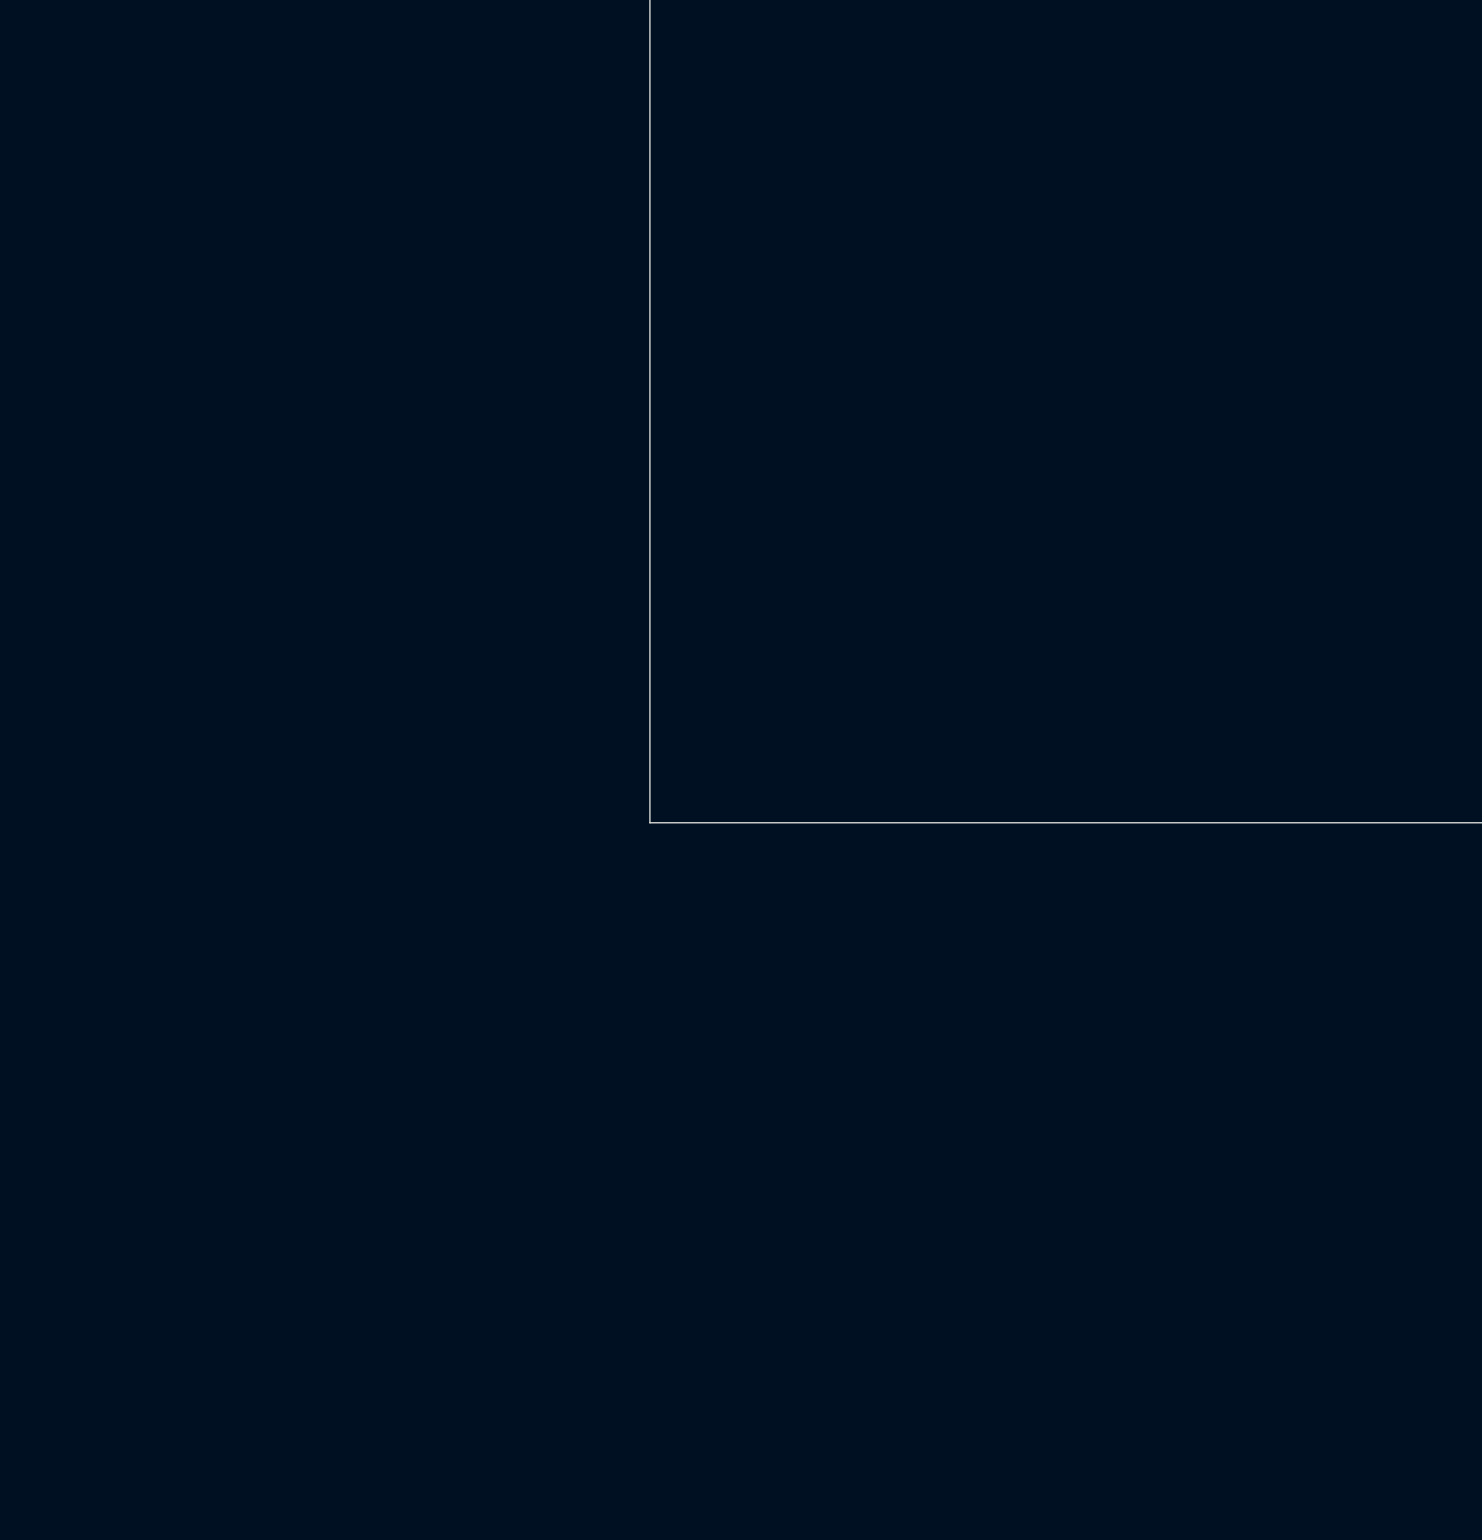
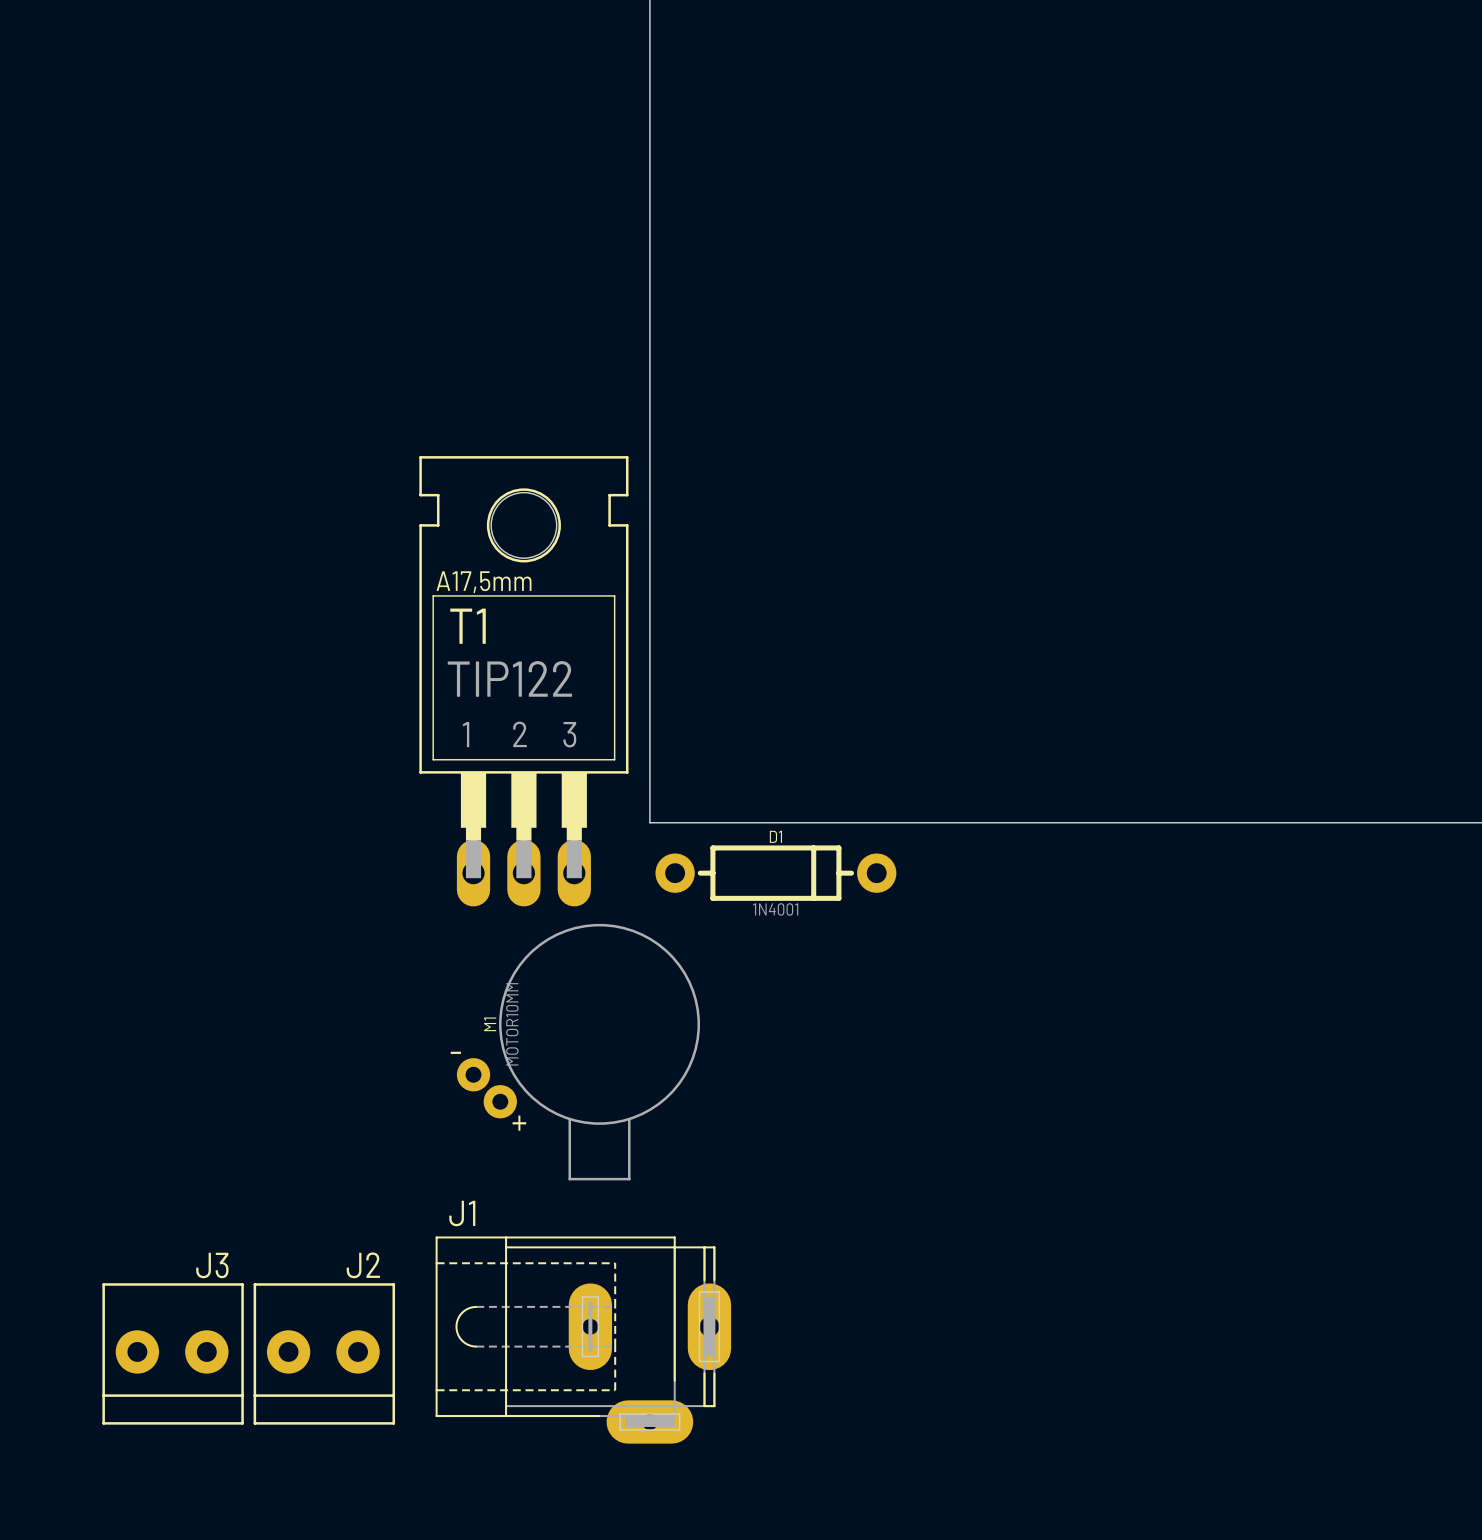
T1: none -> TIP122 (523, 681)
D1: none -> 1N4001 (775, 873)
M1: none -> MOTOR10MM (578, 1052)
J1: none -> (583, 1340)
J3: none -> (173, 1353)
J2: none -> (324, 1353)

